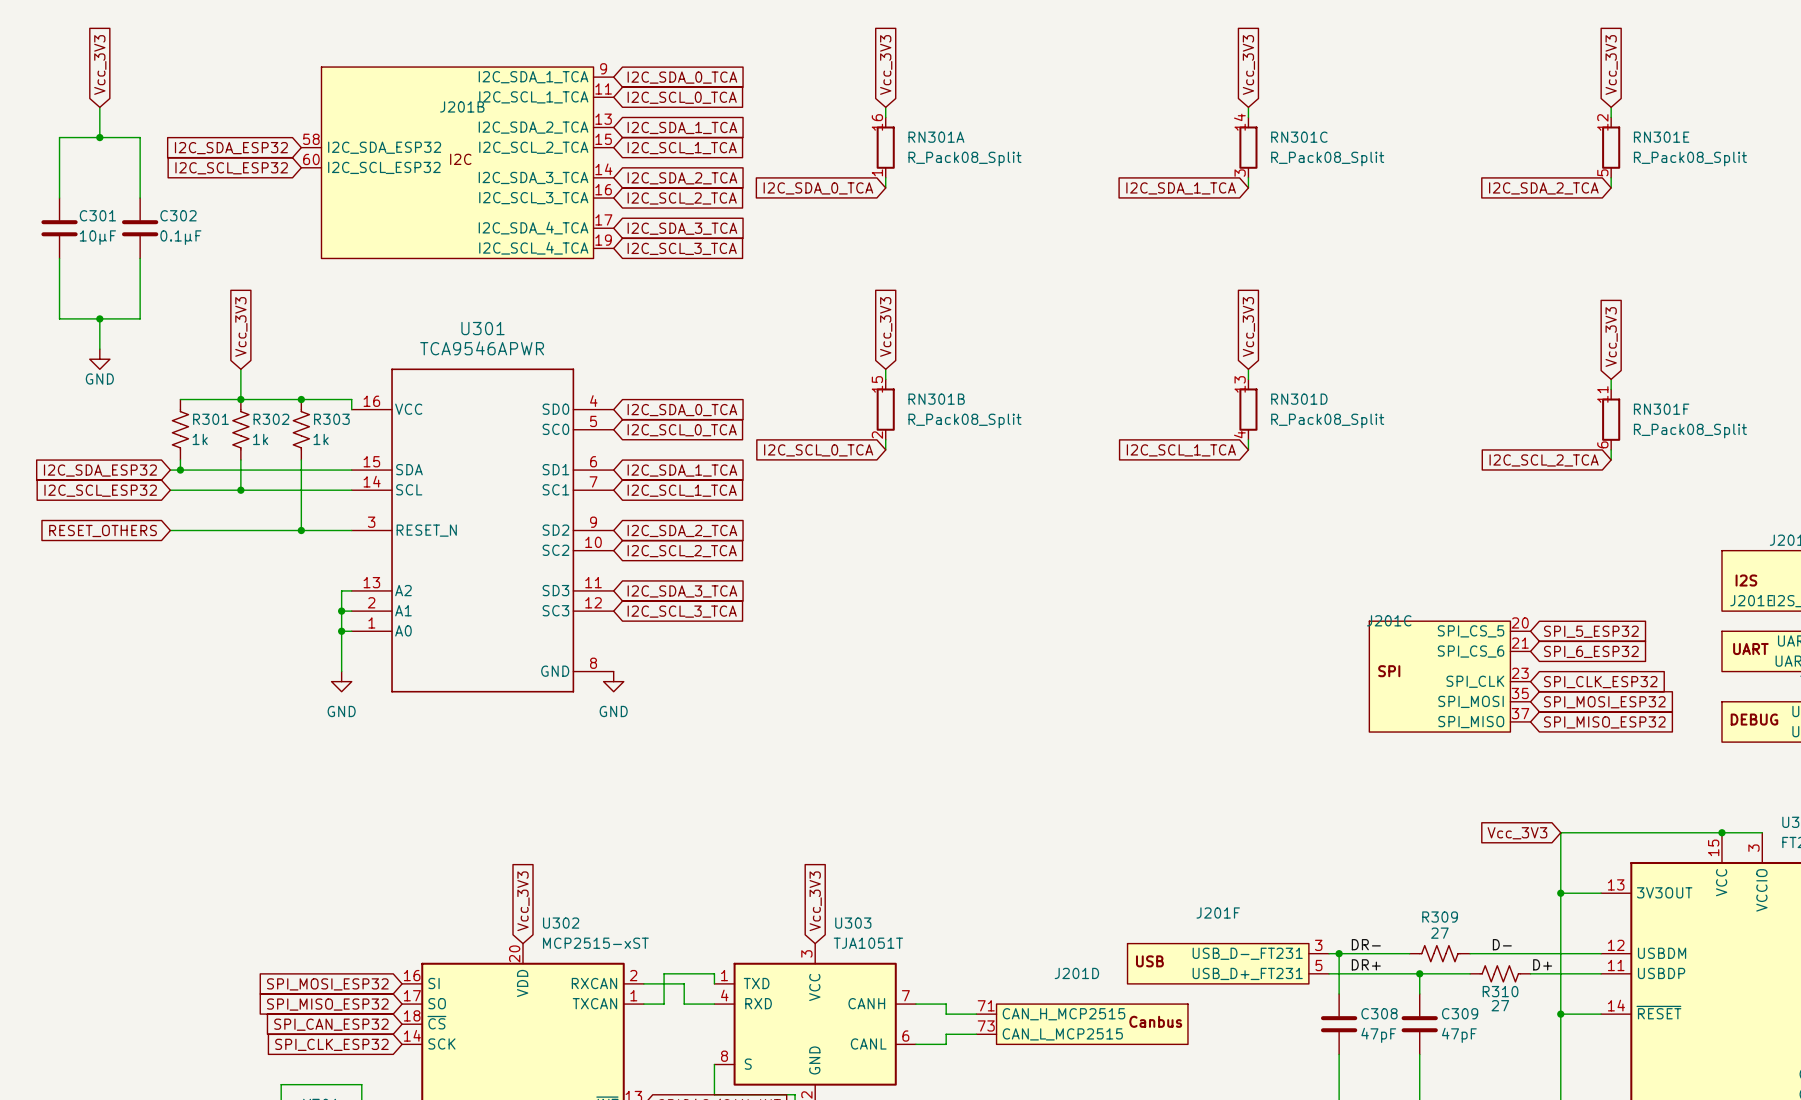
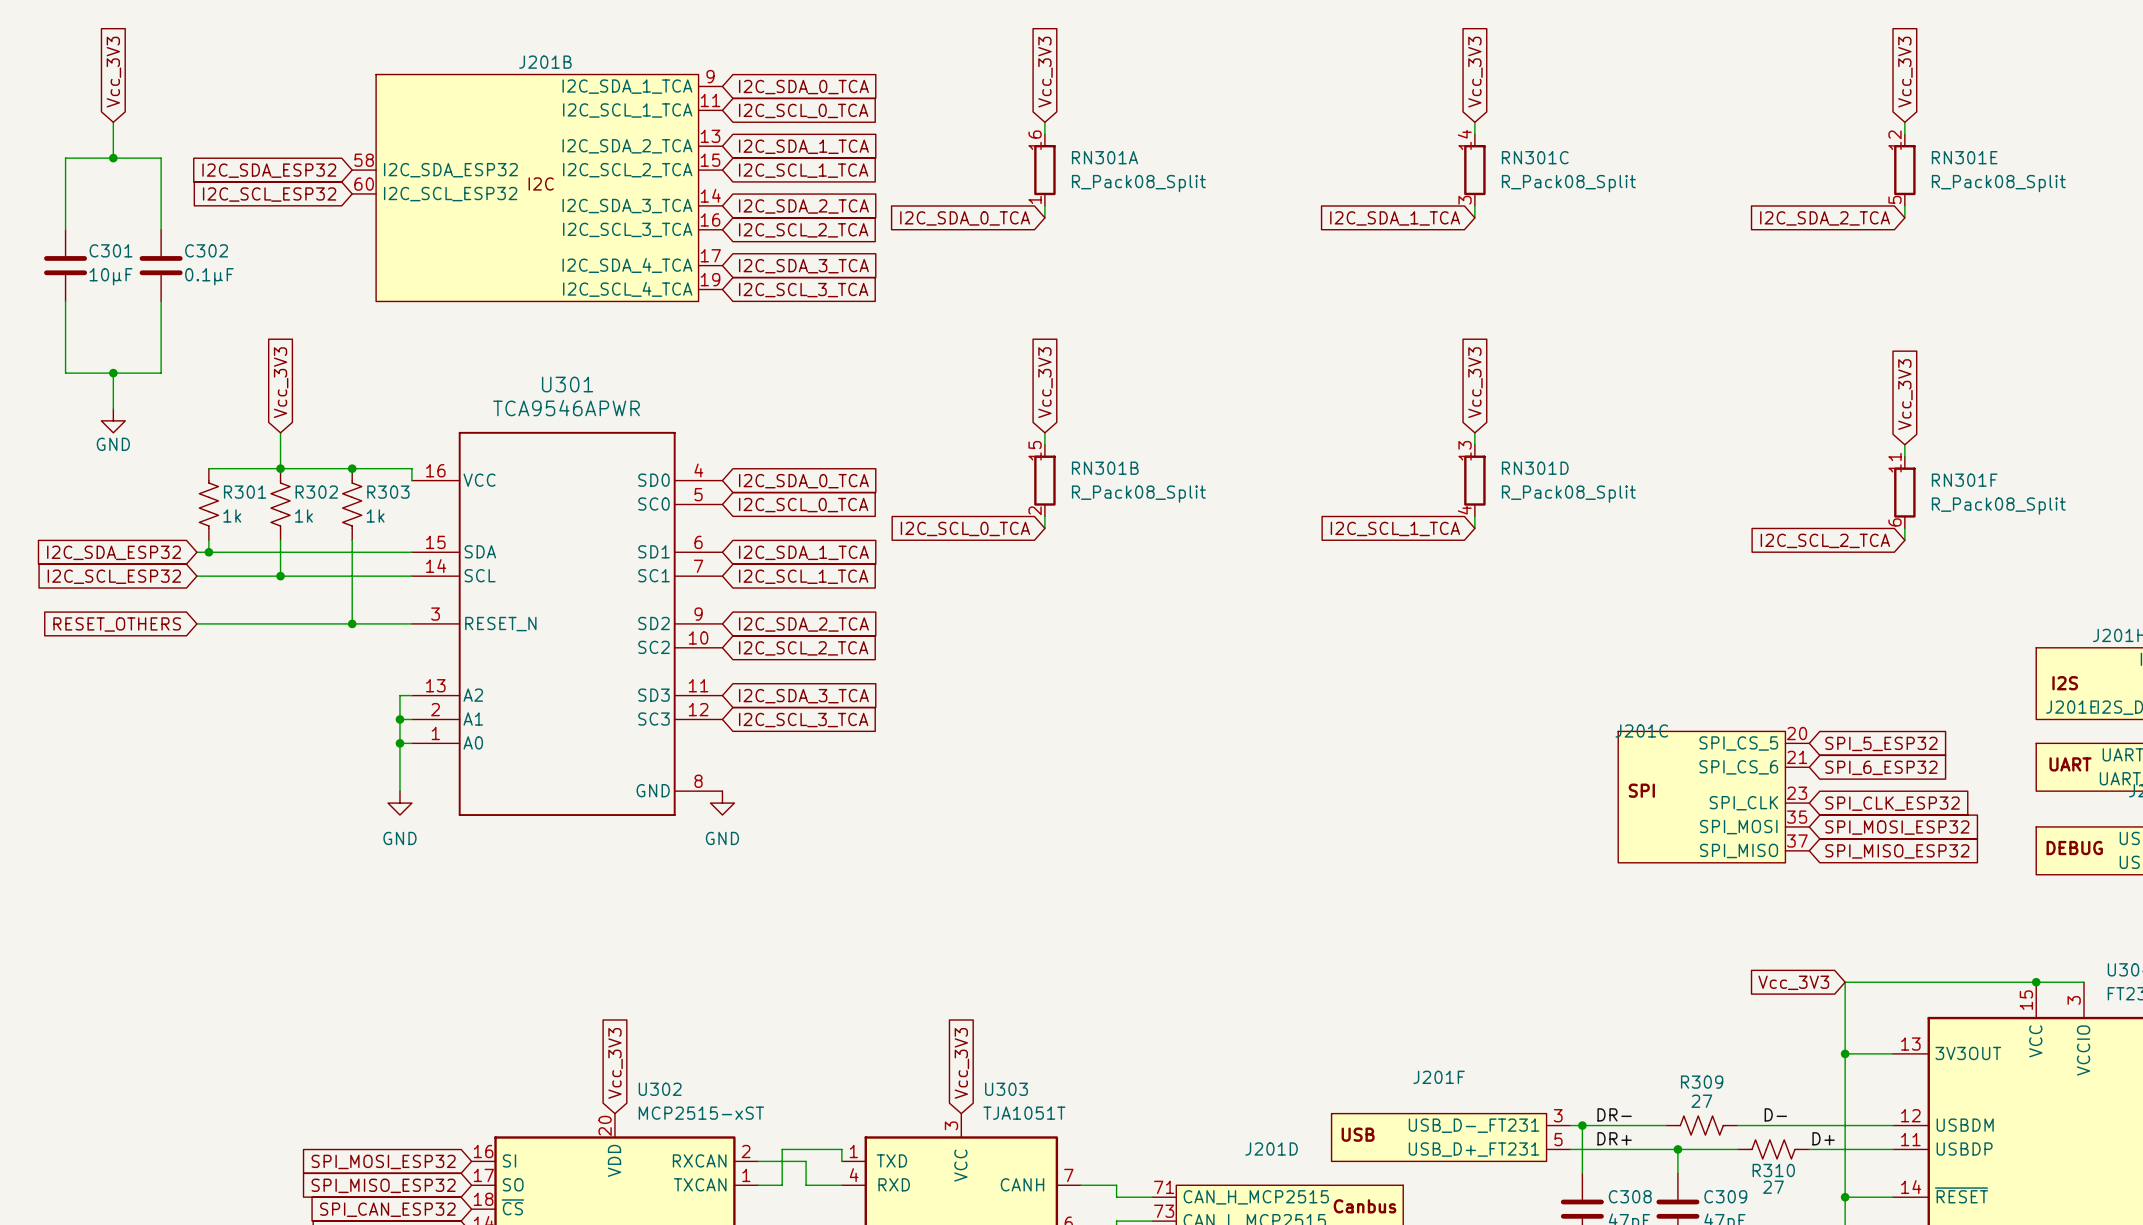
J201B name position: J201B (462, 106) -> J201B (545, 62)

